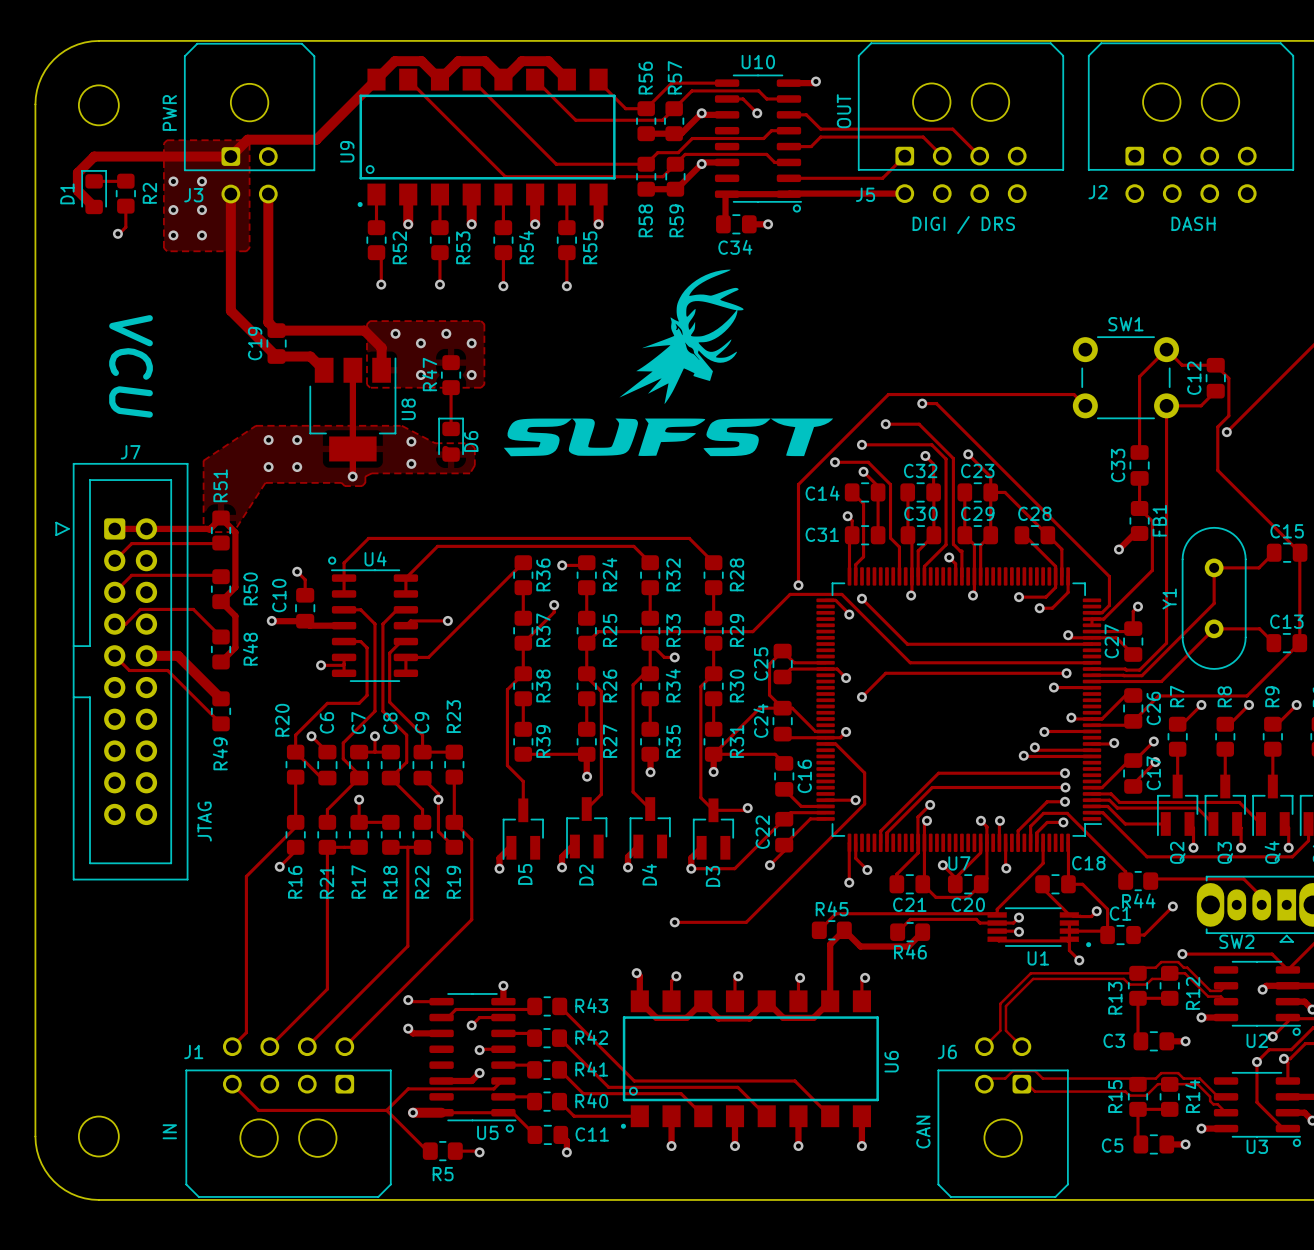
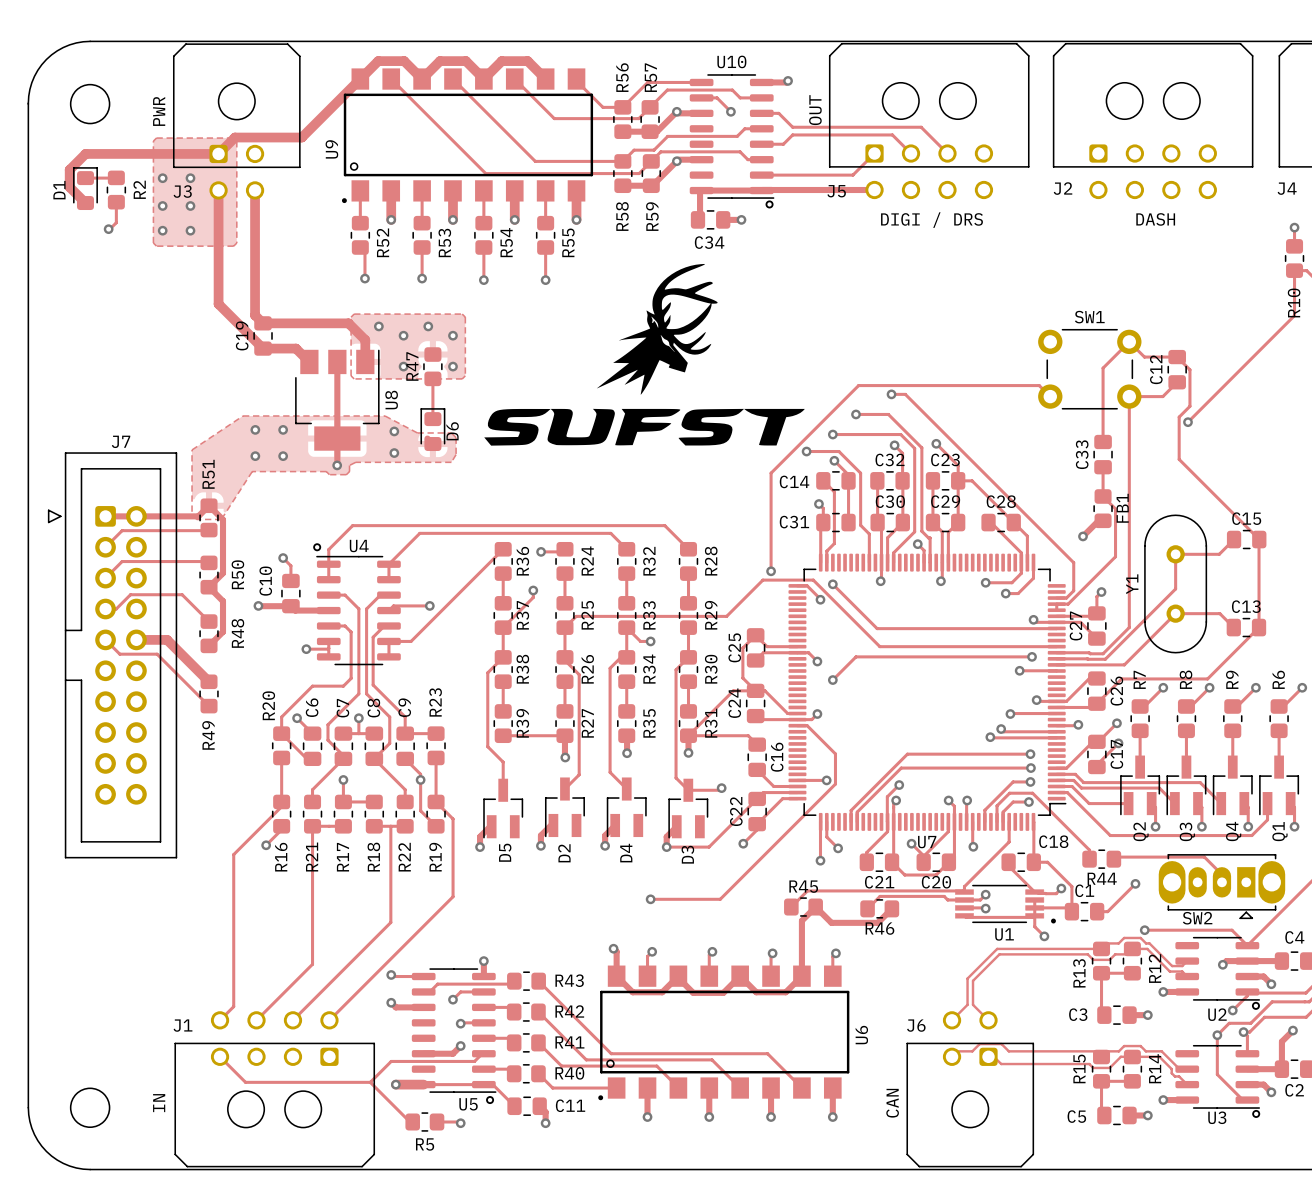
text: VCU (131, 366) -> none
text: JTAG (204, 821) -> none

